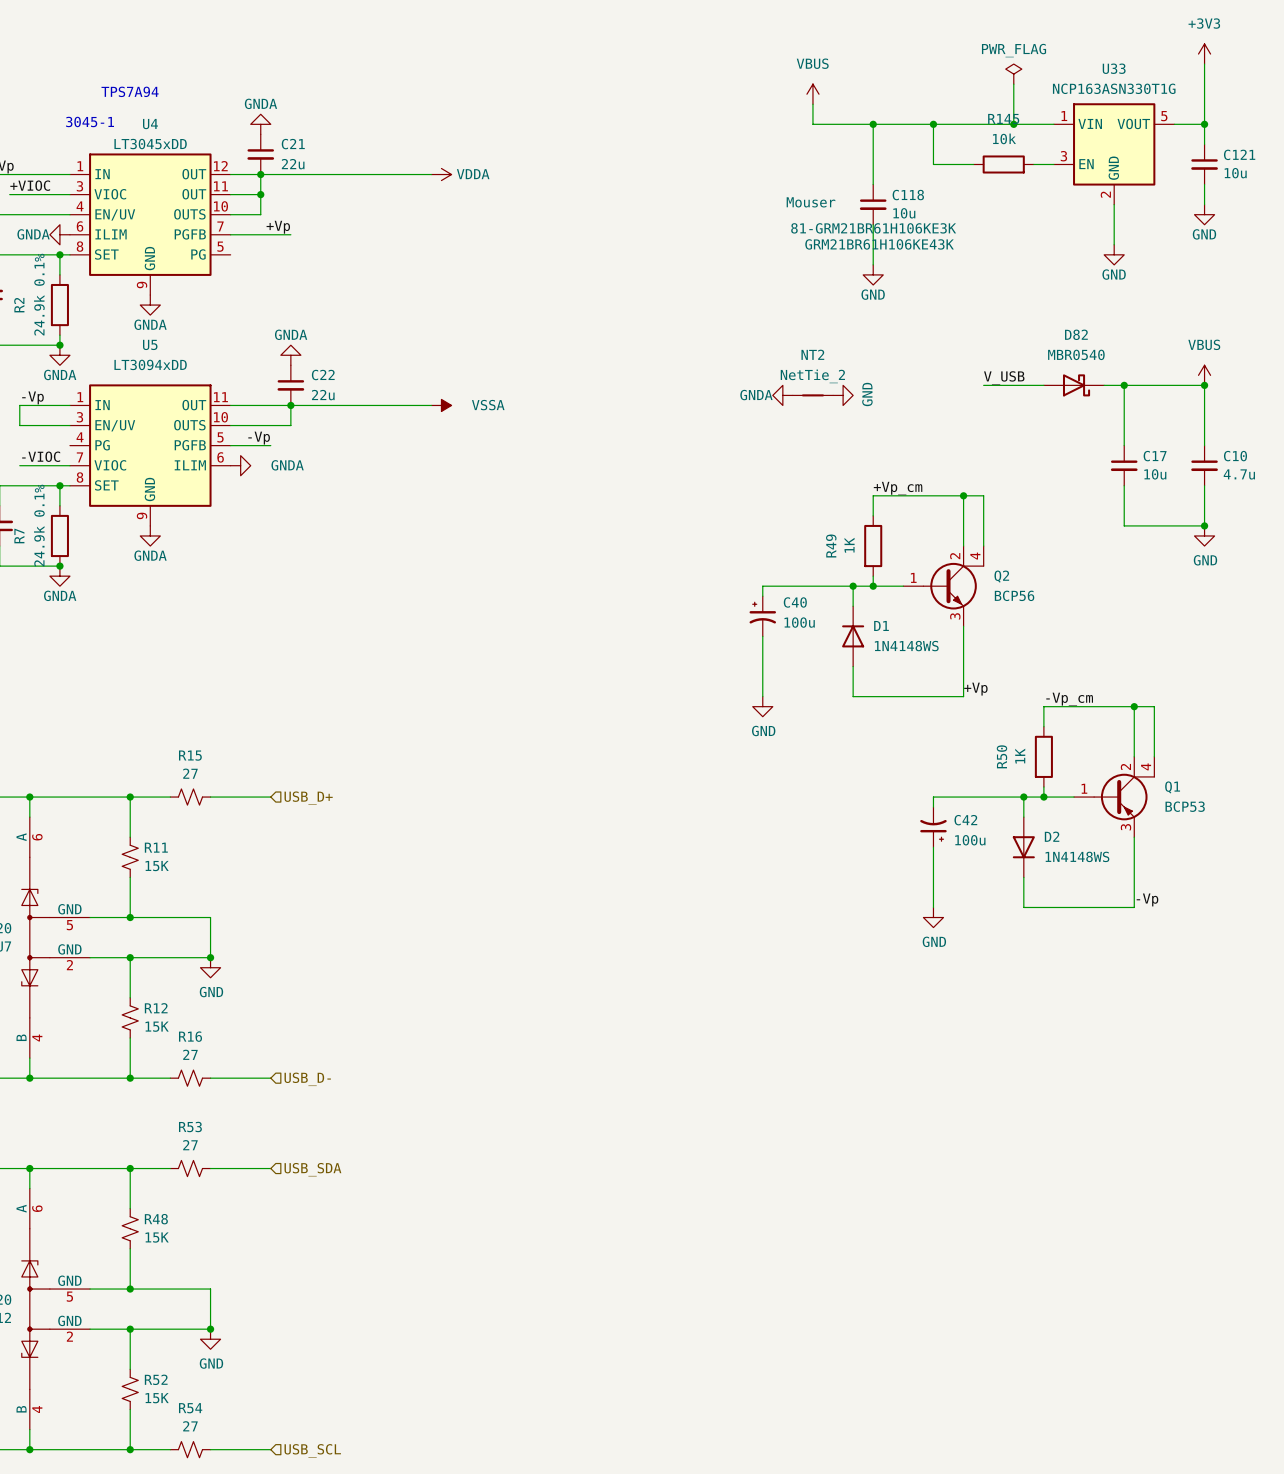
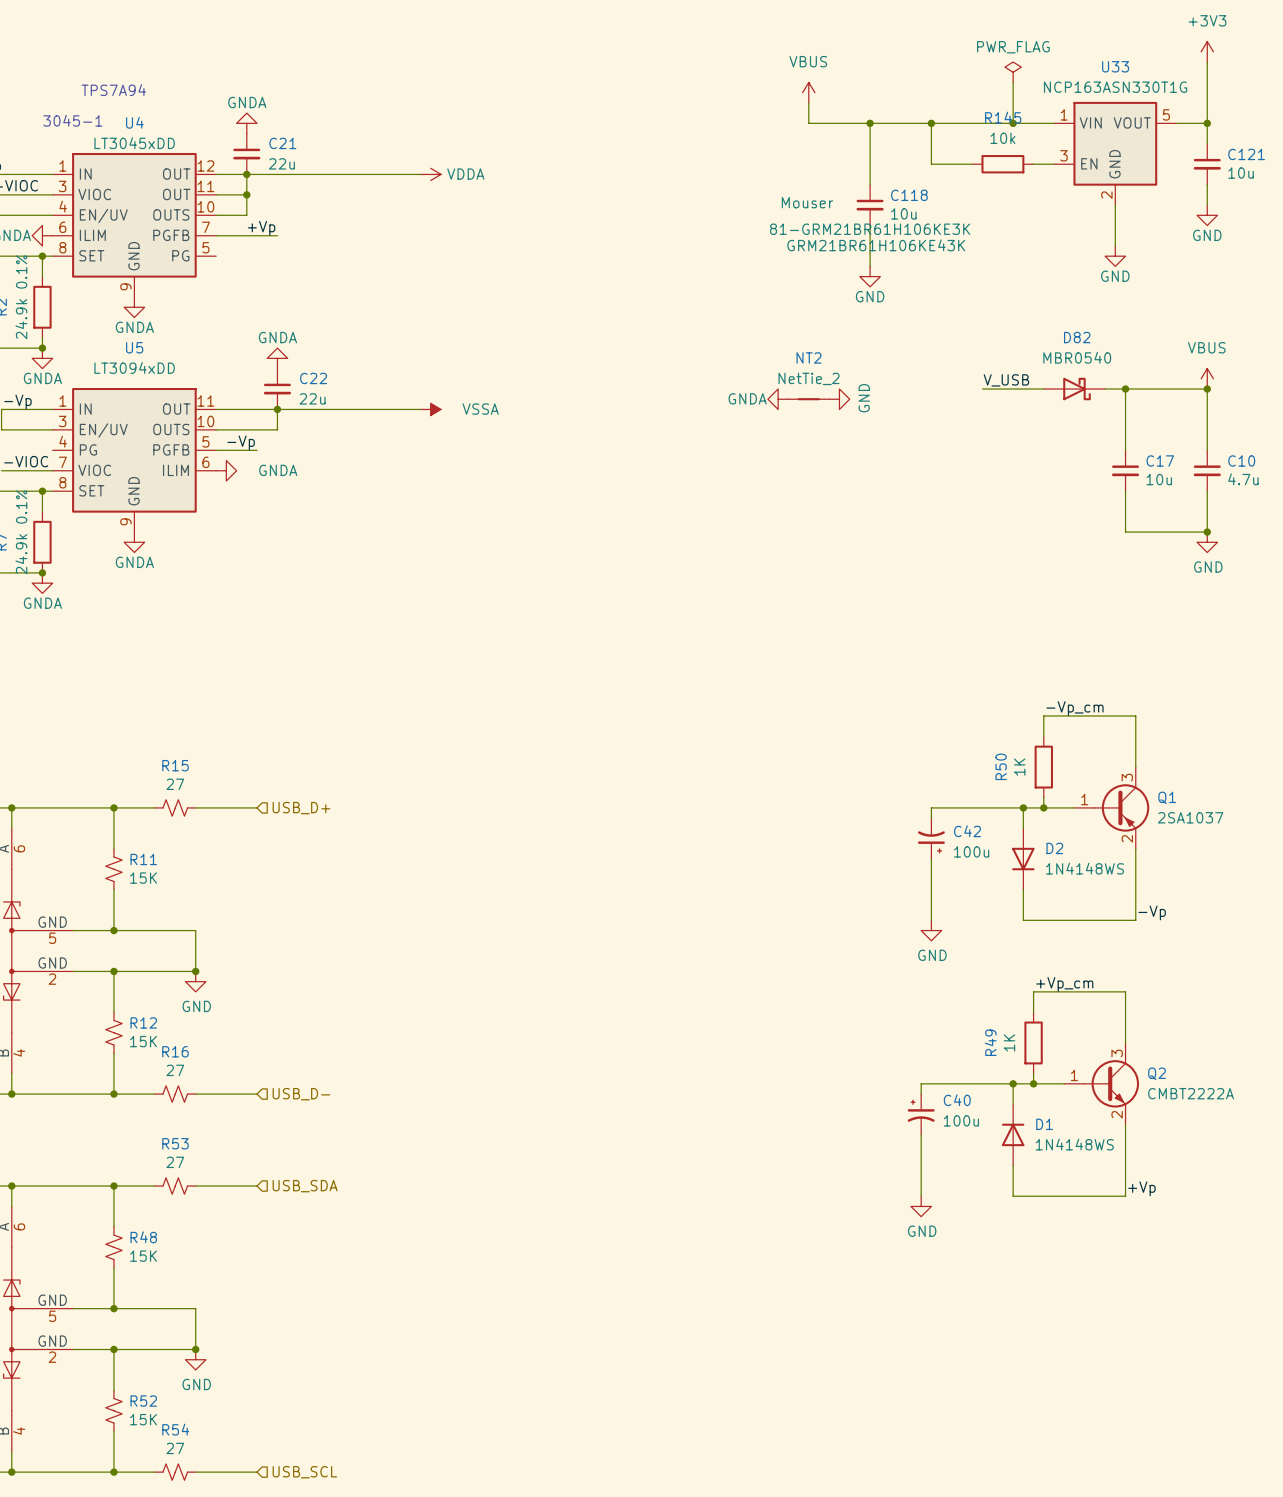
label: +Vp_cm (898, 488) -> none
wire: (963, 495) (963, 546) -> none
junction: (963, 495) -> none
wire: (873, 515) (873, 495) (983, 495) (983, 546) -> none
R49 position: (873, 546) -> (1033, 1042)
Q2 symbol: [903, 546, 984, 627] -> [1064, 1042, 1140, 1125]
wire: (873, 576) (873, 586) -> none
wire: (853, 586) (853, 606) -> none
junction: (853, 586) -> none
junction: (873, 586) -> none
wire: (903, 586) (762, 586) (762, 596) -> none
Q2 value: BCP56 (1014, 595) -> CMBT2222A (1191, 1093)
C40 position: (762, 616) -> (921, 1114)
wire: (963, 626) (963, 696) (853, 696) (853, 666) -> none
wire: (762, 636) (762, 696) -> none
D1 position: (853, 636) -> (1013, 1134)
label: +Vp (975, 689) -> none
power symbol: GND (762, 706) -> none
wire: (1134, 706) (1154, 706) (1154, 756) -> none
junction: (1134, 706) -> none
Q1 symbol: [1074, 756, 1155, 838] -> [1074, 767, 1150, 849]
Q1 value: BCP53 (1185, 806) -> 2SA1037 (1190, 817)
label: none -> +Vp_cm (1064, 984)
wire: none -> (1033, 1012) (1033, 991) (1125, 991) (1125, 1042)
wire: none -> (1033, 1073) (1033, 1083)
wire: none -> (1013, 1083) (1013, 1104)
junction: none -> (1013, 1083)
junction: none -> (1033, 1083)
wire: none -> (1064, 1083) (921, 1083) (921, 1094)
wire: none -> (1125, 1124) (1125, 1196) (1013, 1196) (1013, 1165)
wire: none -> (921, 1134) (921, 1196)
label: none -> +Vp (1141, 1188)
power symbol: none -> GND (921, 1206)

